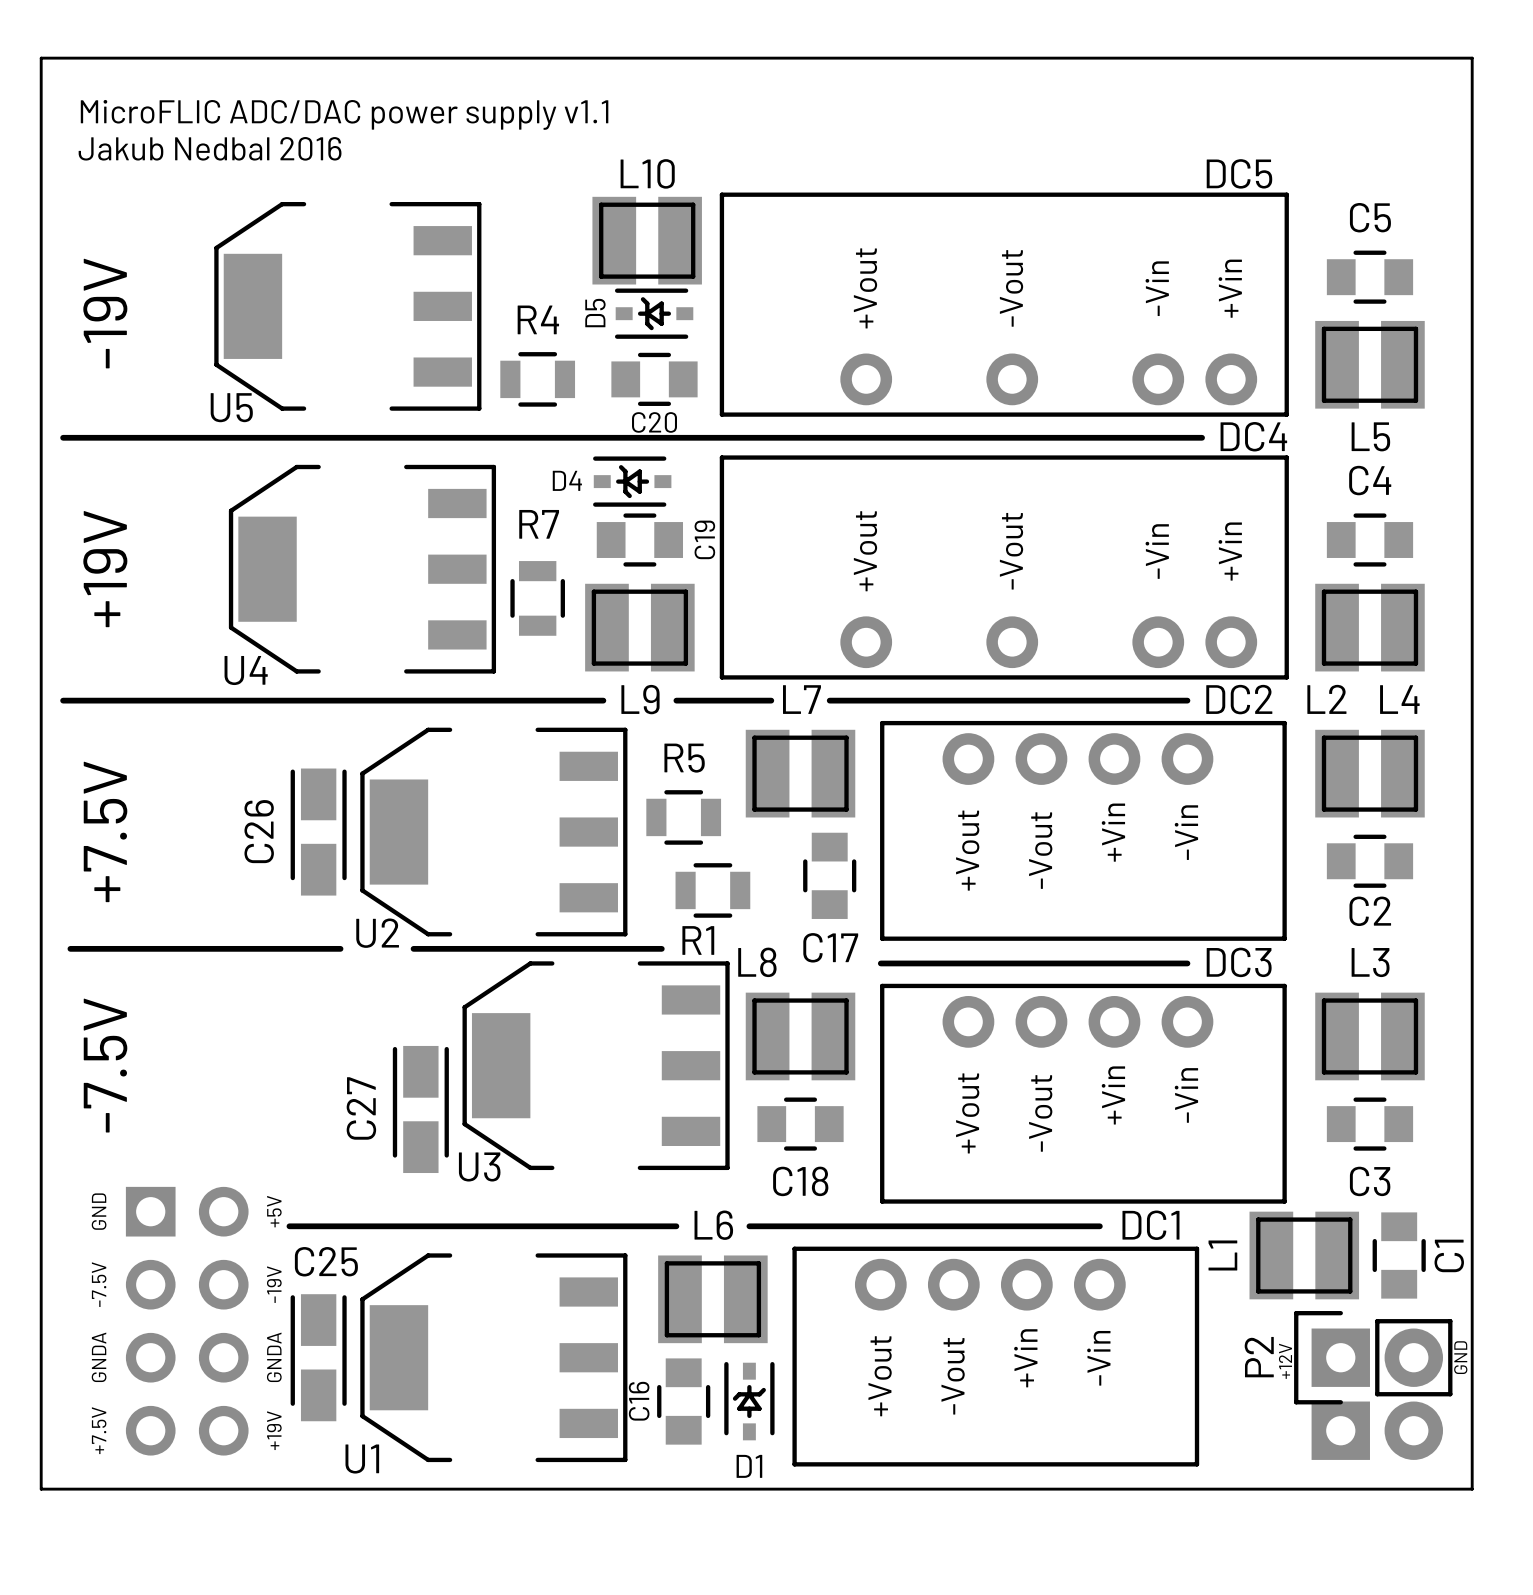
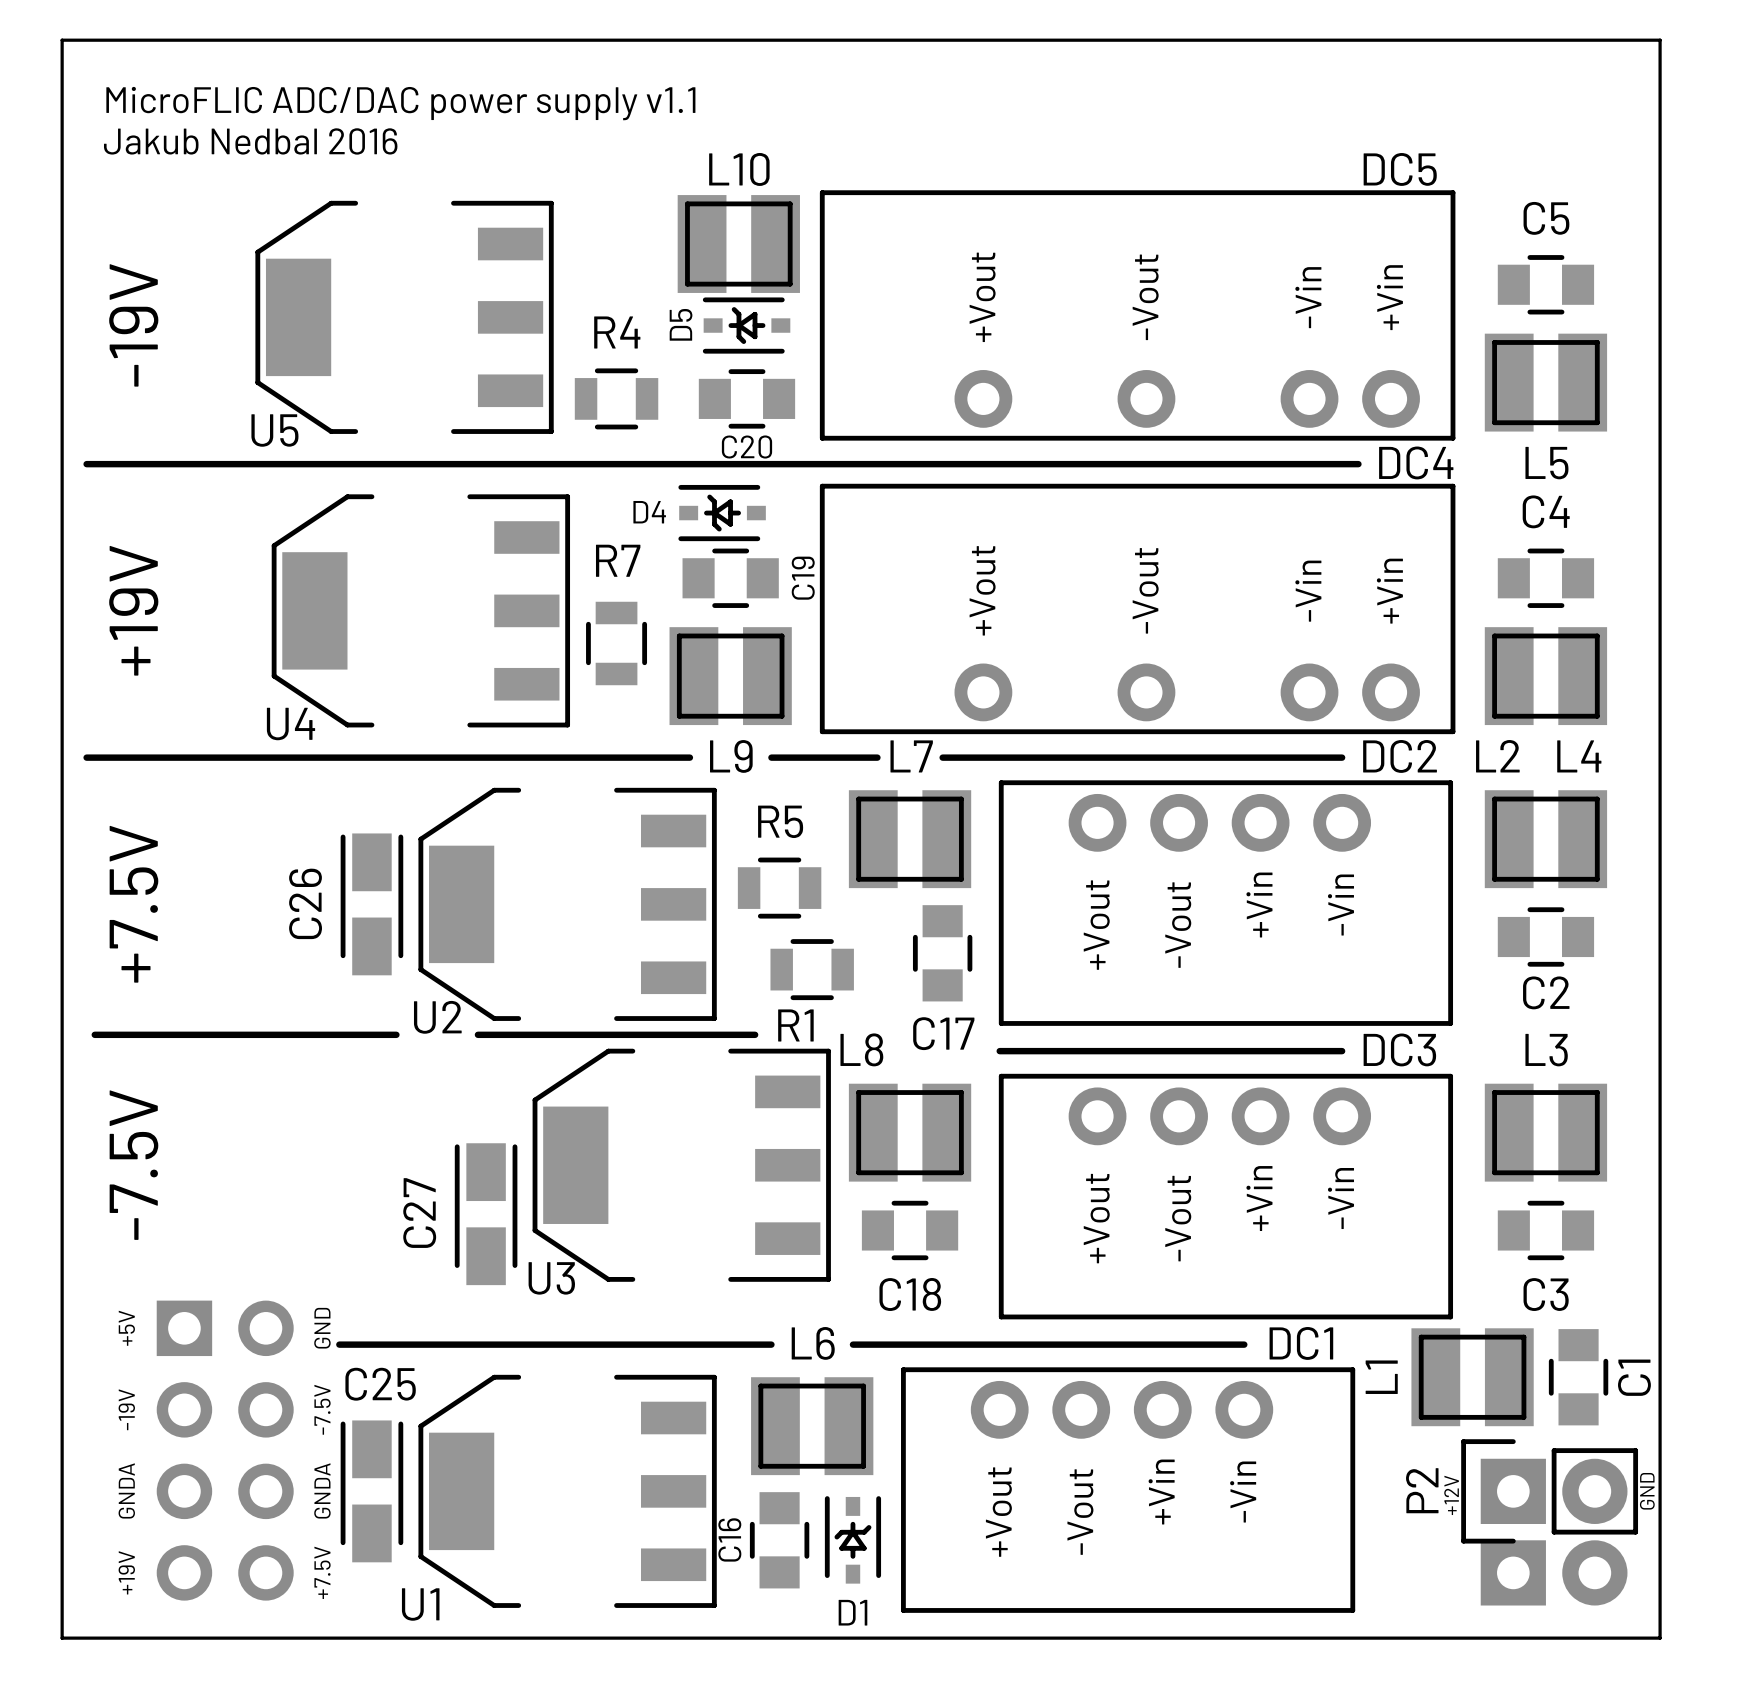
text: GND (99, 1211) -> +5V (126, 1328)
text: +5V (274, 1211) -> GND (322, 1328)
text: -7.5V (99, 1284) -> -19V (126, 1409)
text: -19V (274, 1284) -> -7.5V (322, 1409)
text: +7.5V (99, 1430) -> +19V (126, 1572)
text: +19V (274, 1430) -> +7.5V (322, 1572)

